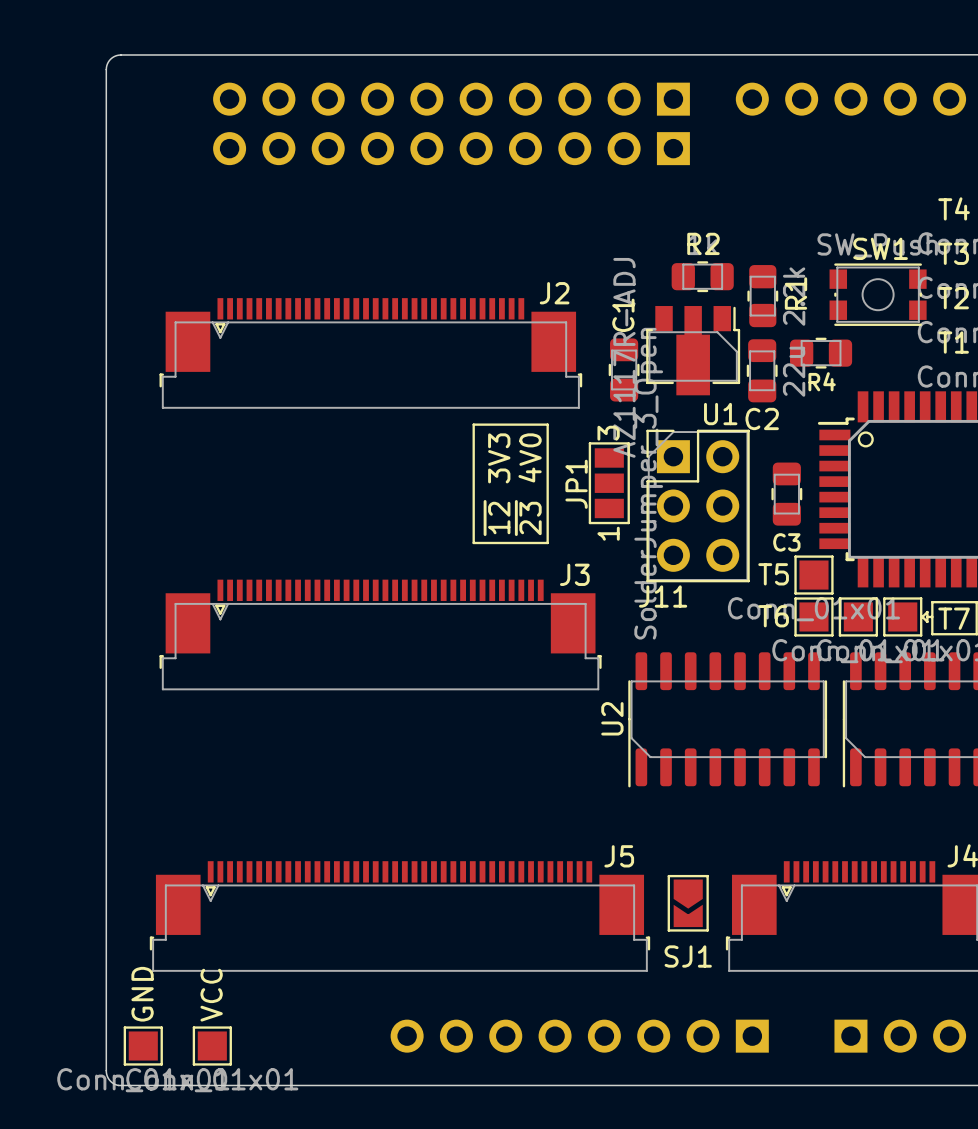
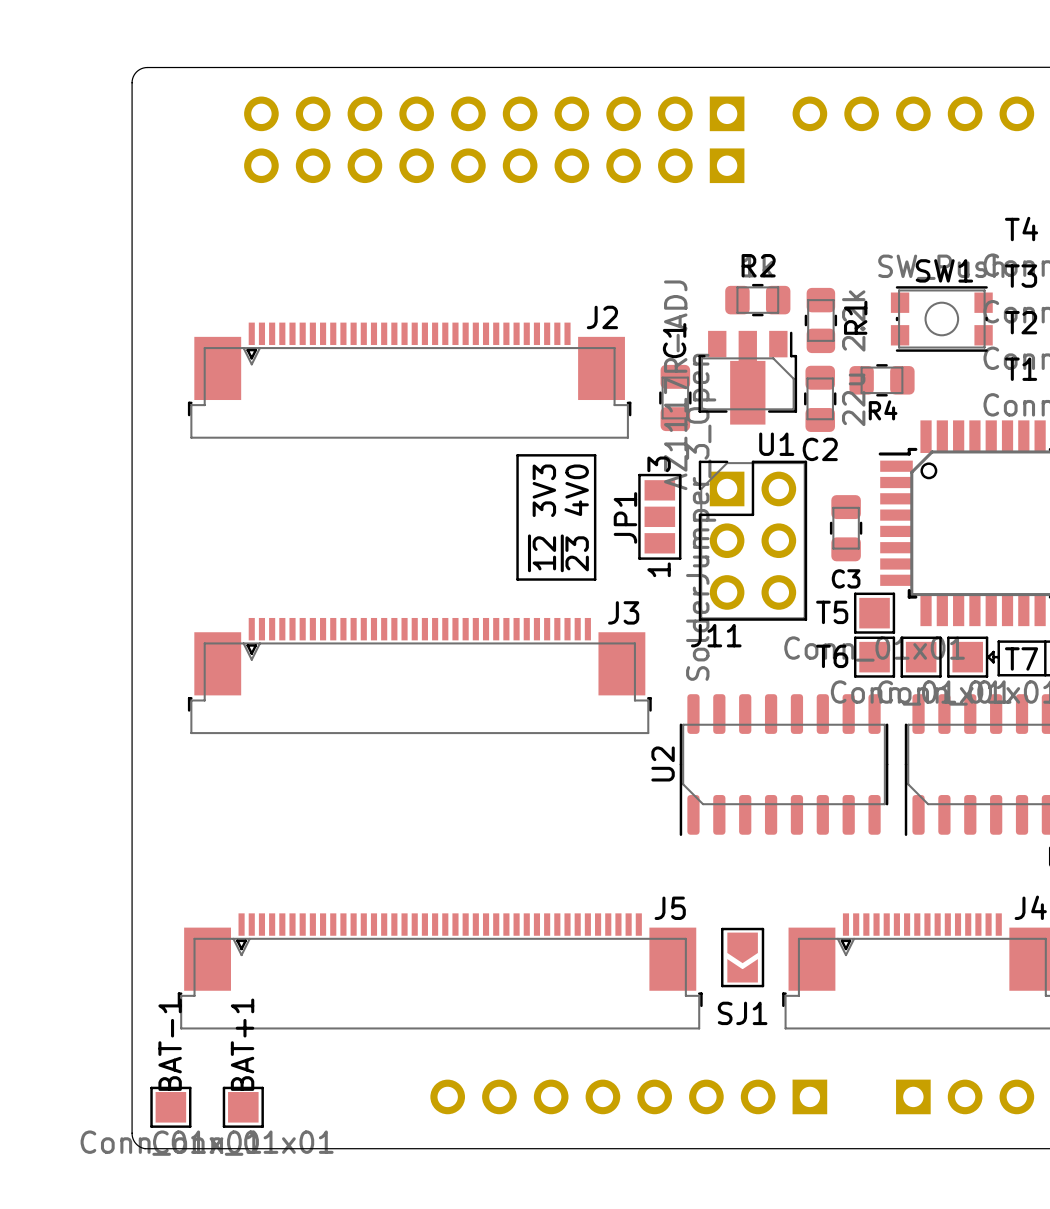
GND name: GND (142, 994) -> BAT-1 (170, 1044)
VCC name: VCC (211, 995) -> BAT+1 (242, 1044)

